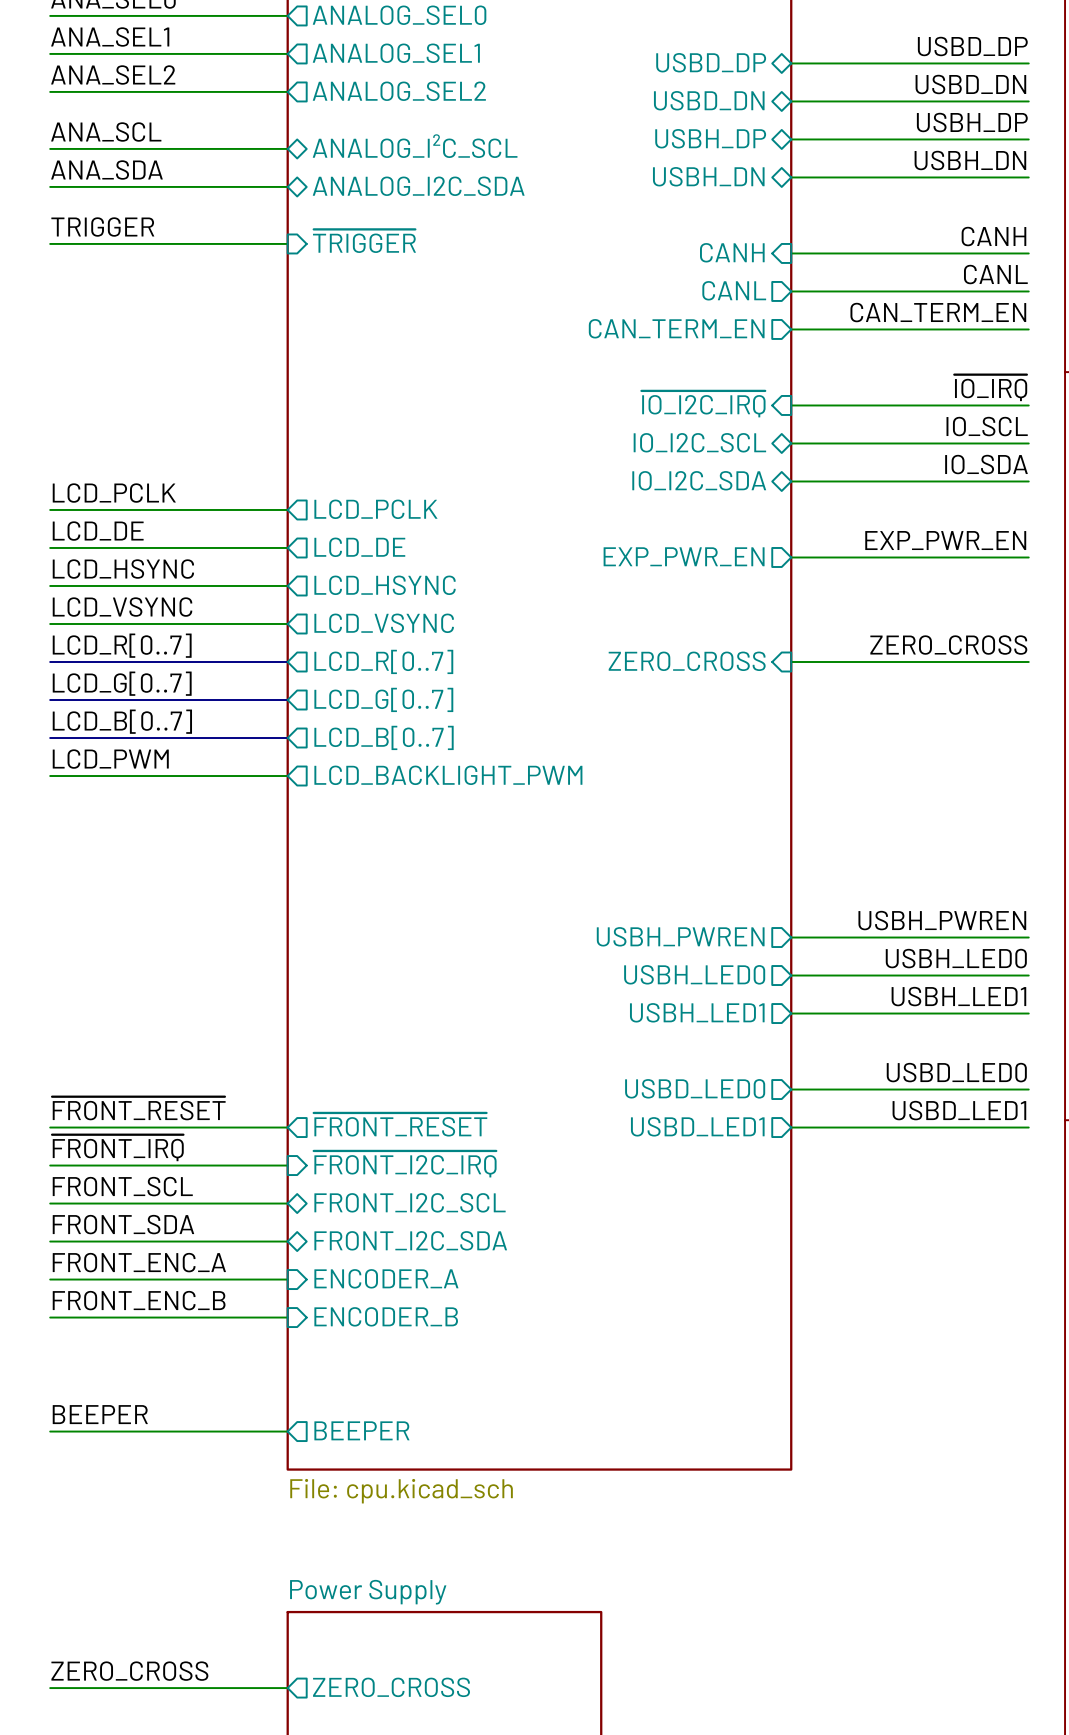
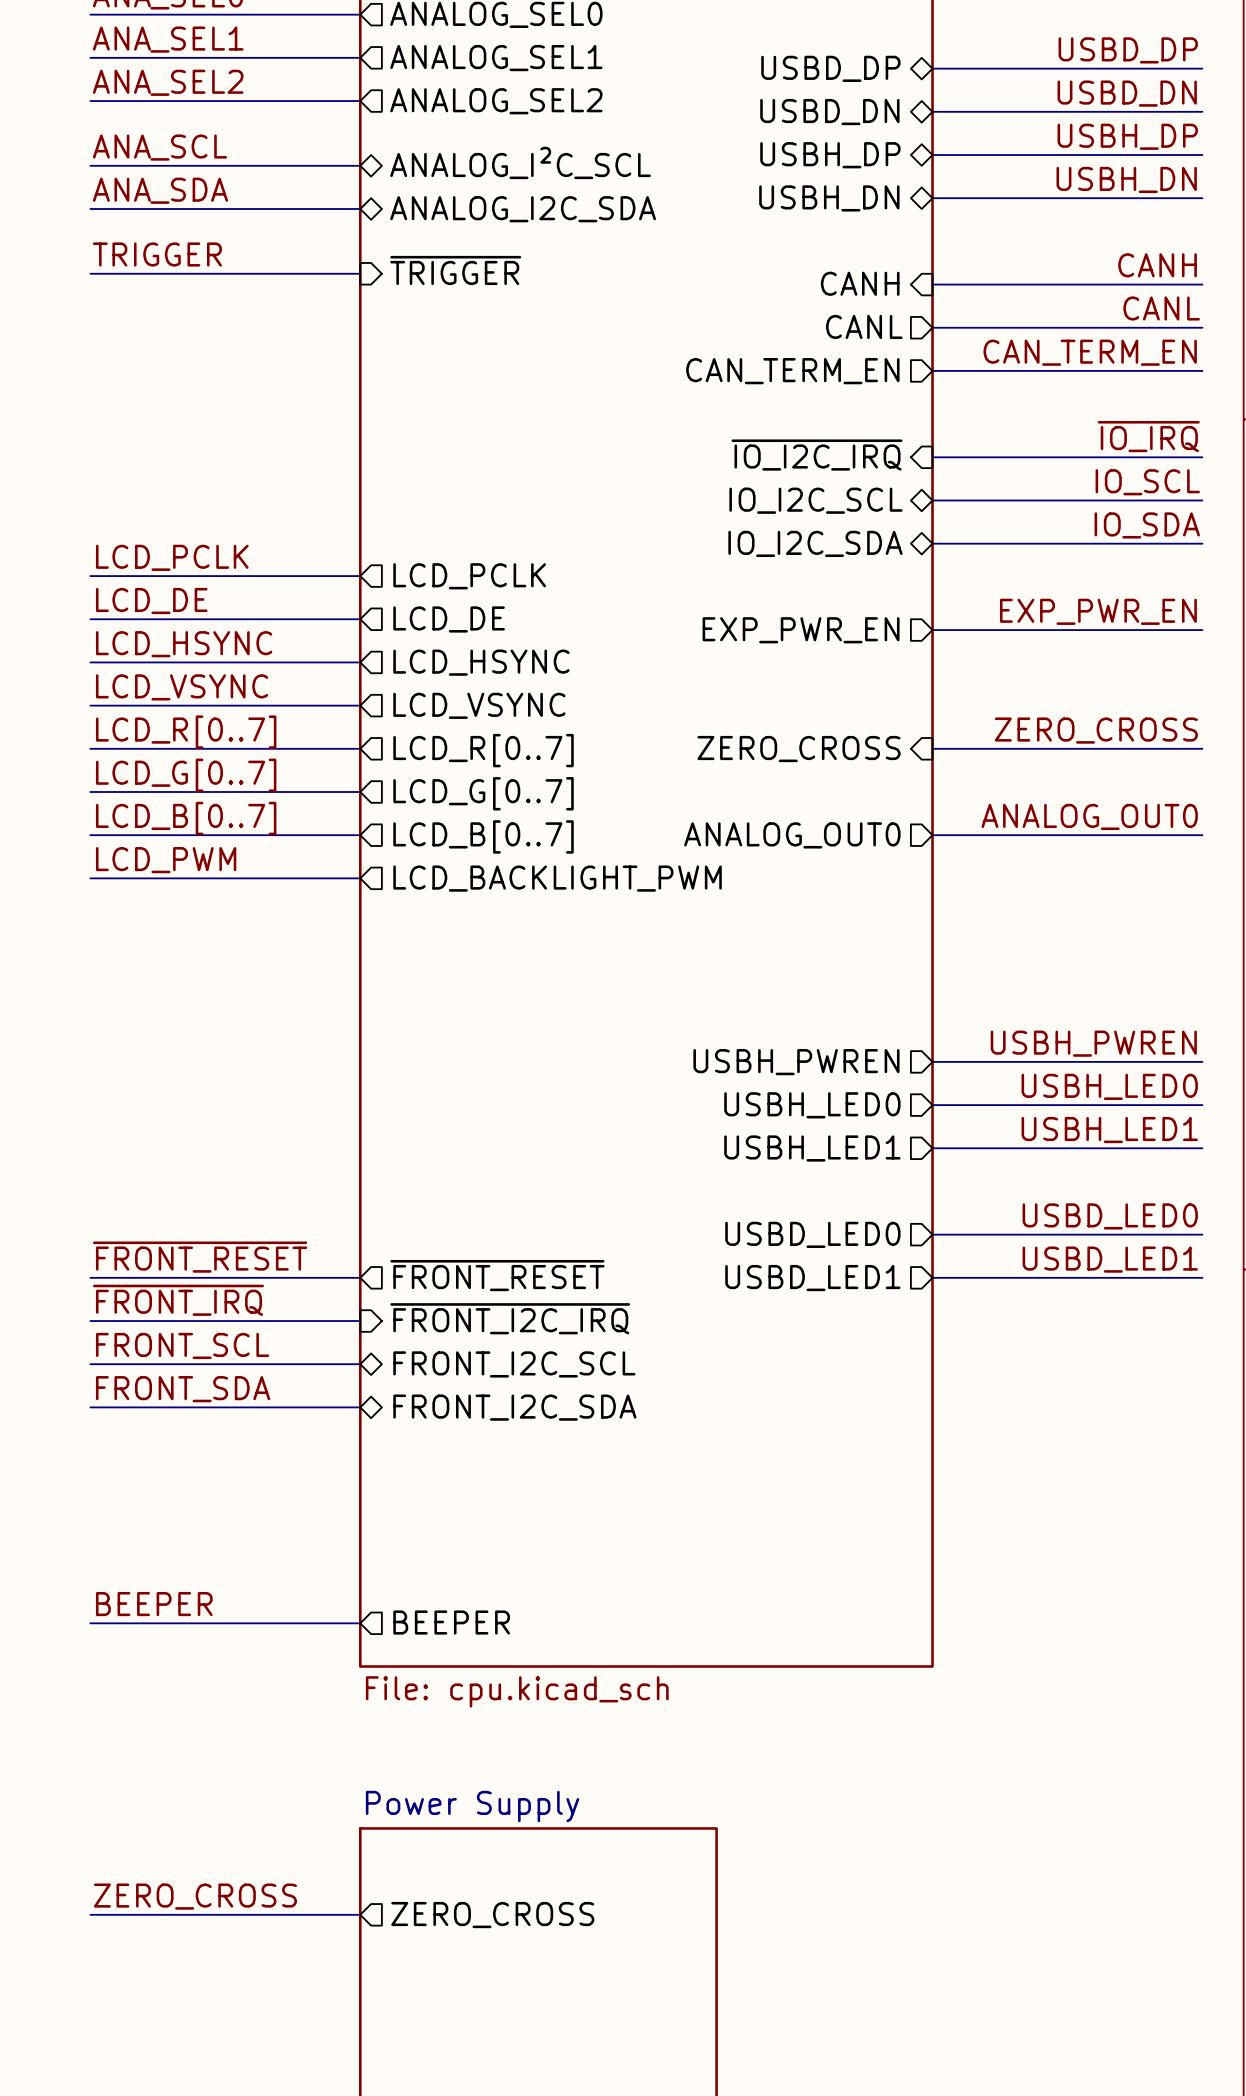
label: none -> ANALOG_OUT0 (1089, 816)
sheet pin: none -> ANALOG_OUT0 (792, 835)
wire: none -> (932, 835) (1202, 835)
label: FRONT_ENC_A (139, 1262) -> none
sheet pin: ENCODER_A (386, 1278) -> none
wire: (50, 1279) (287, 1279) -> none
label: FRONT_ENC_B (139, 1300) -> none
sheet pin: ENCODER_B (386, 1316) -> none
wire: (50, 1317) (287, 1317) -> none

